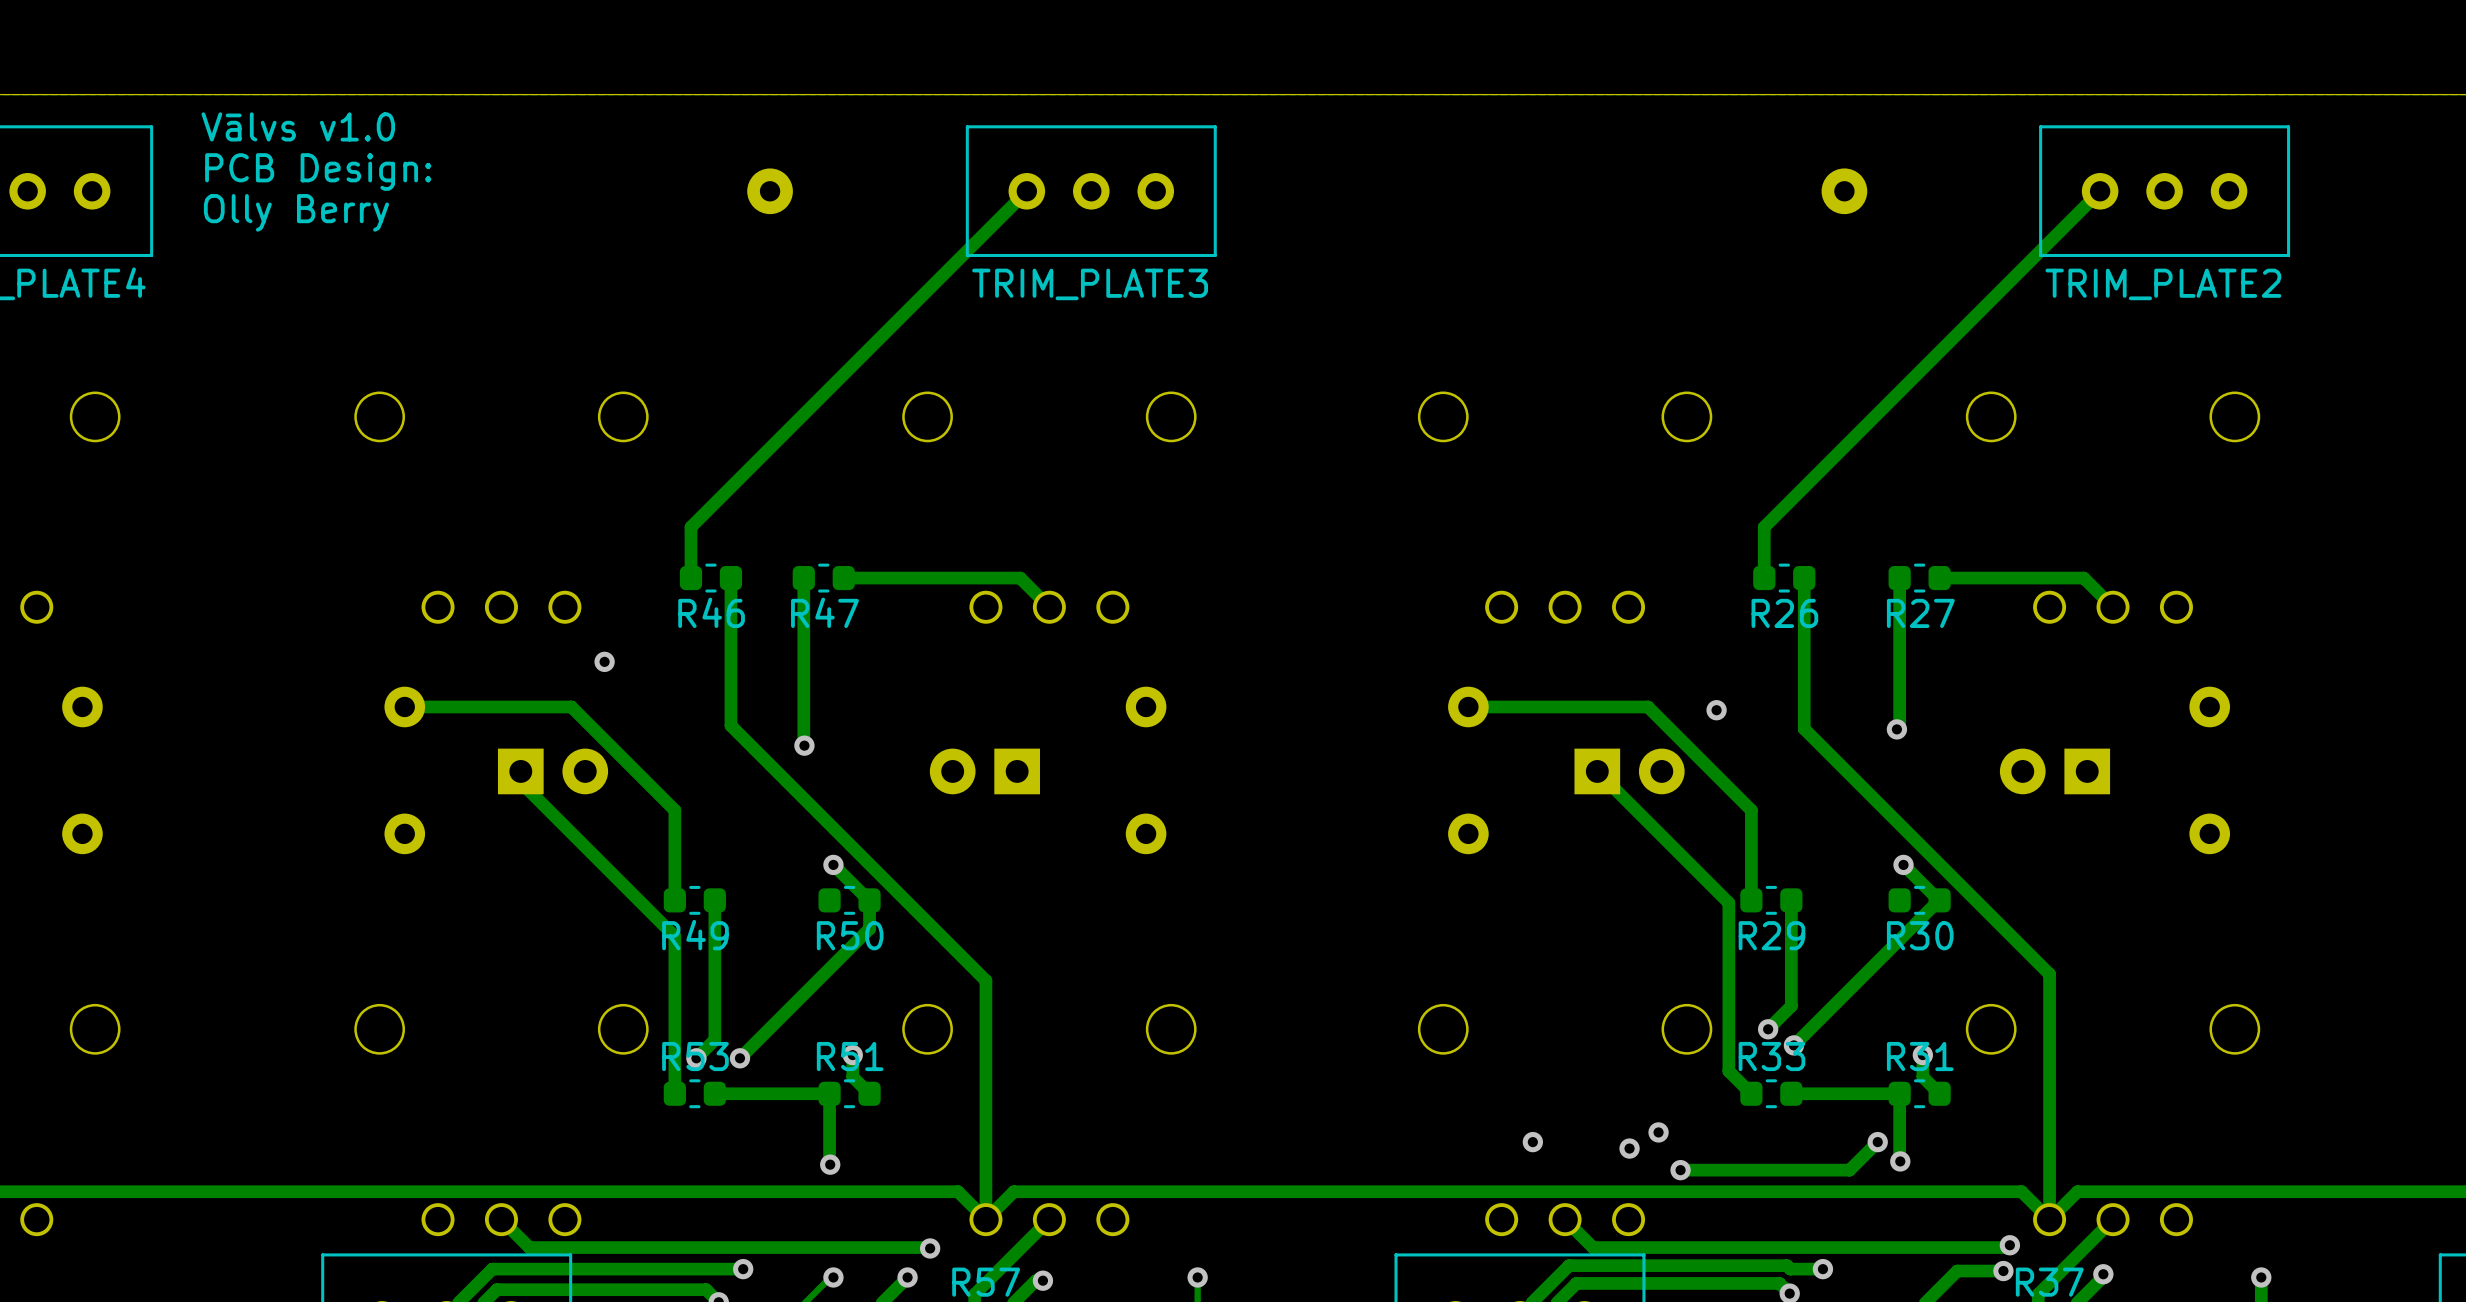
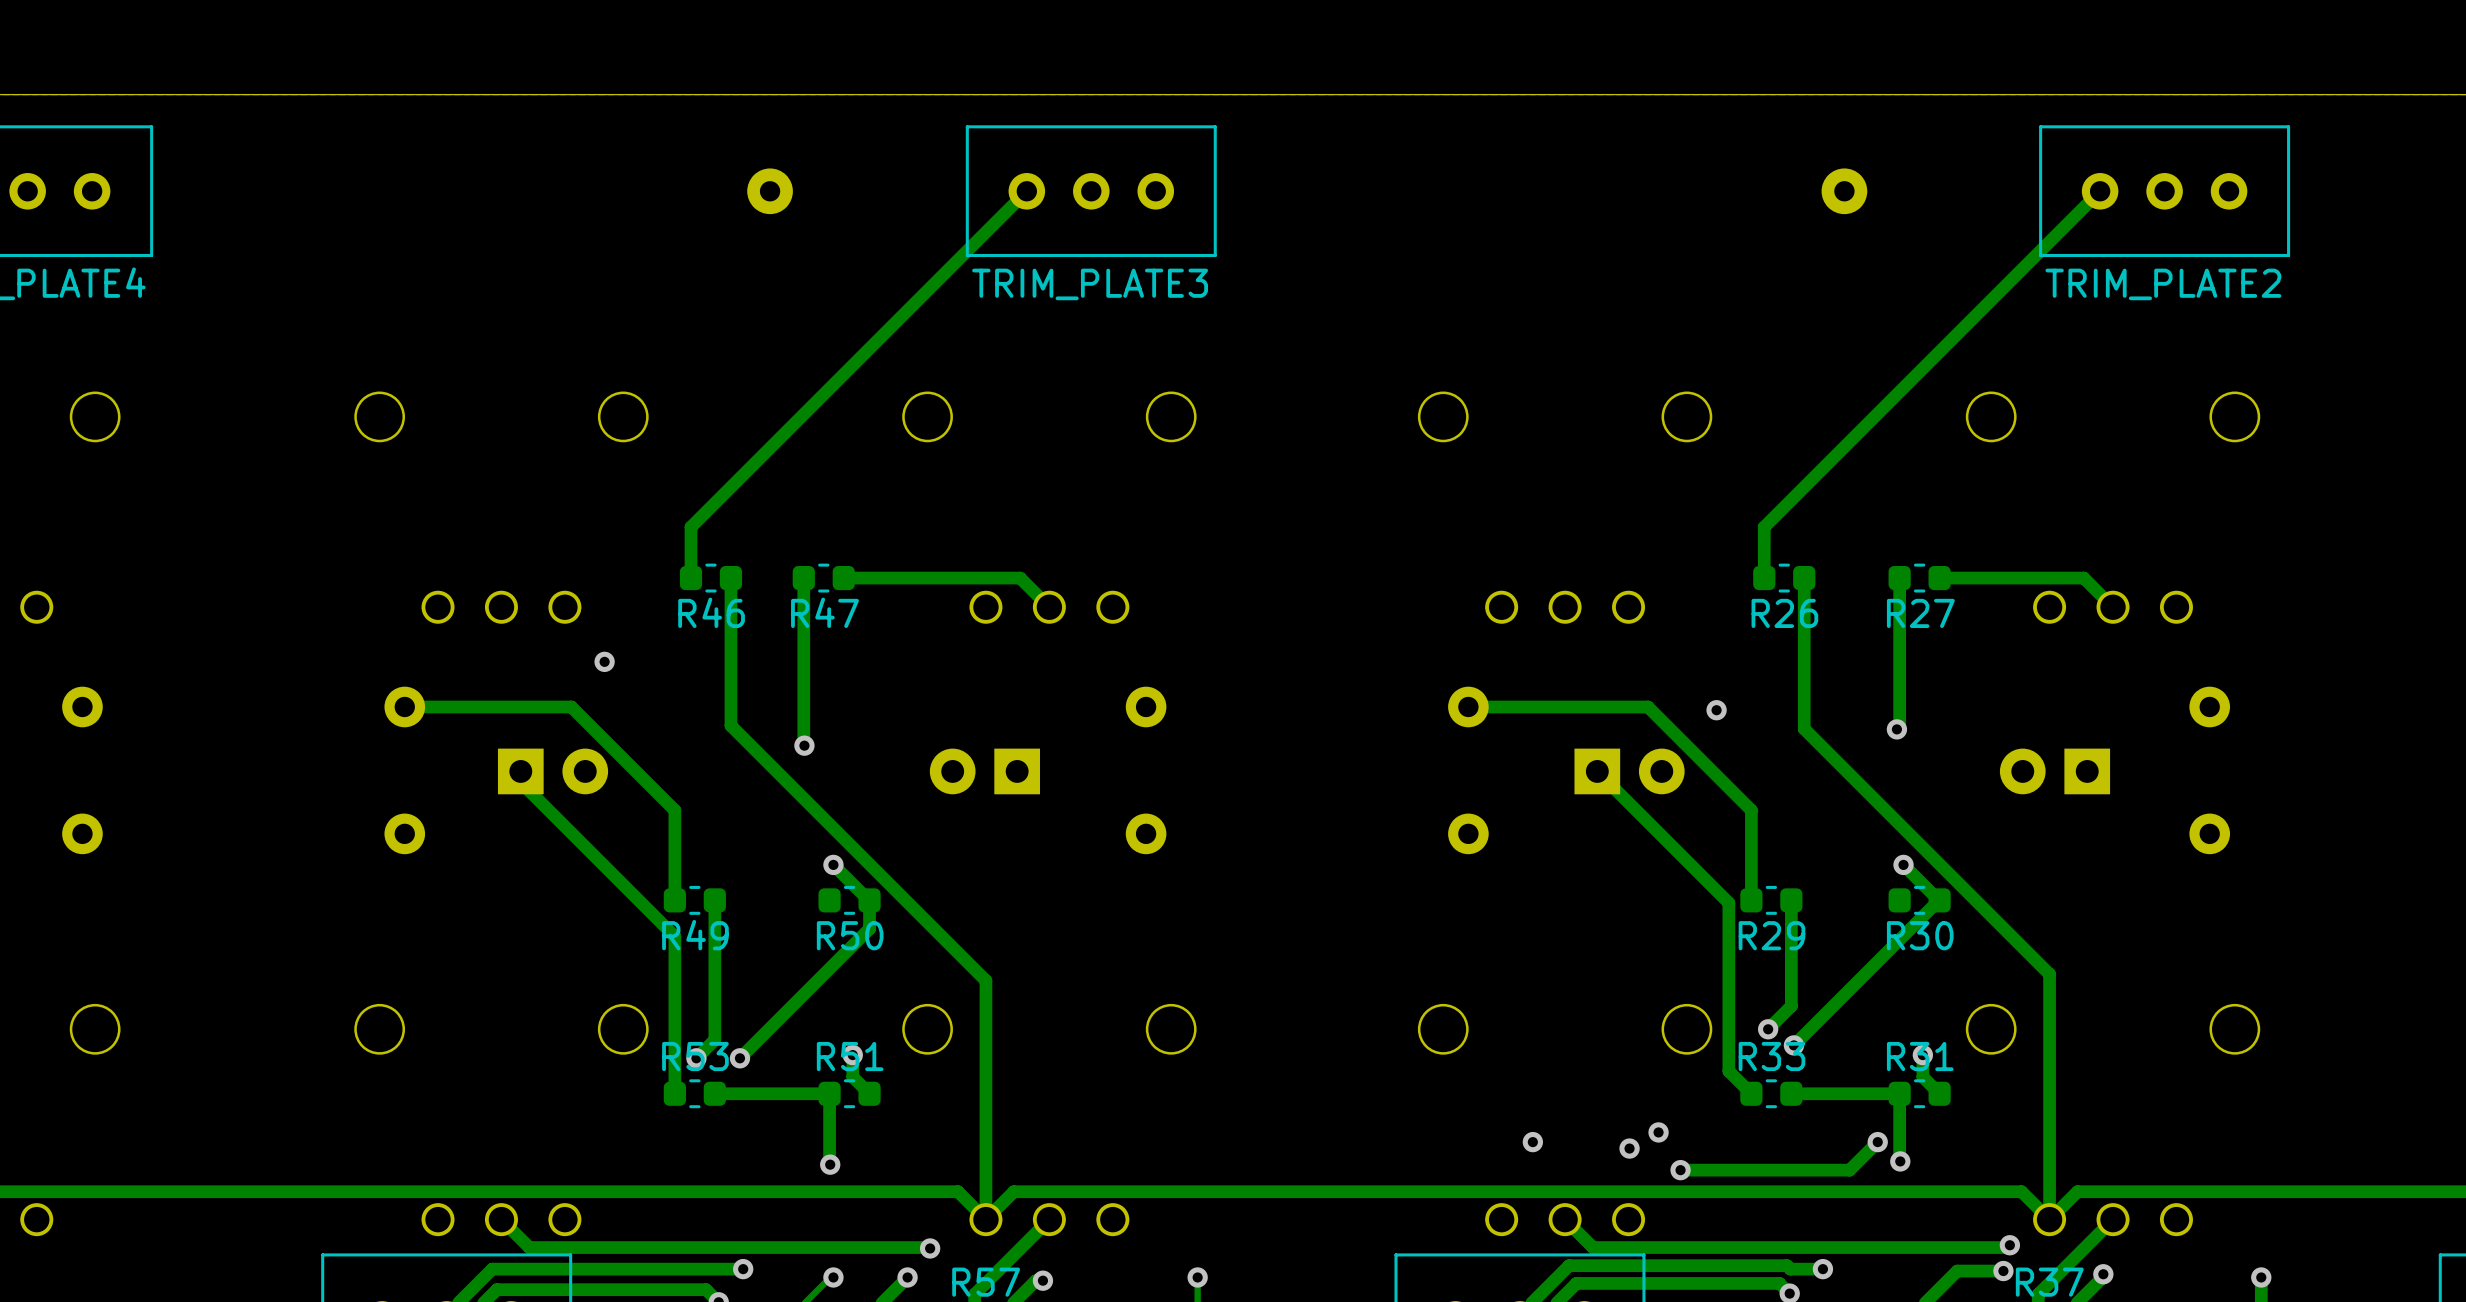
text: Vālvs v1.0 (298, 126) -> none
text: PCB Design: (318, 172) -> none
text: Olly Berry (296, 212) -> none

